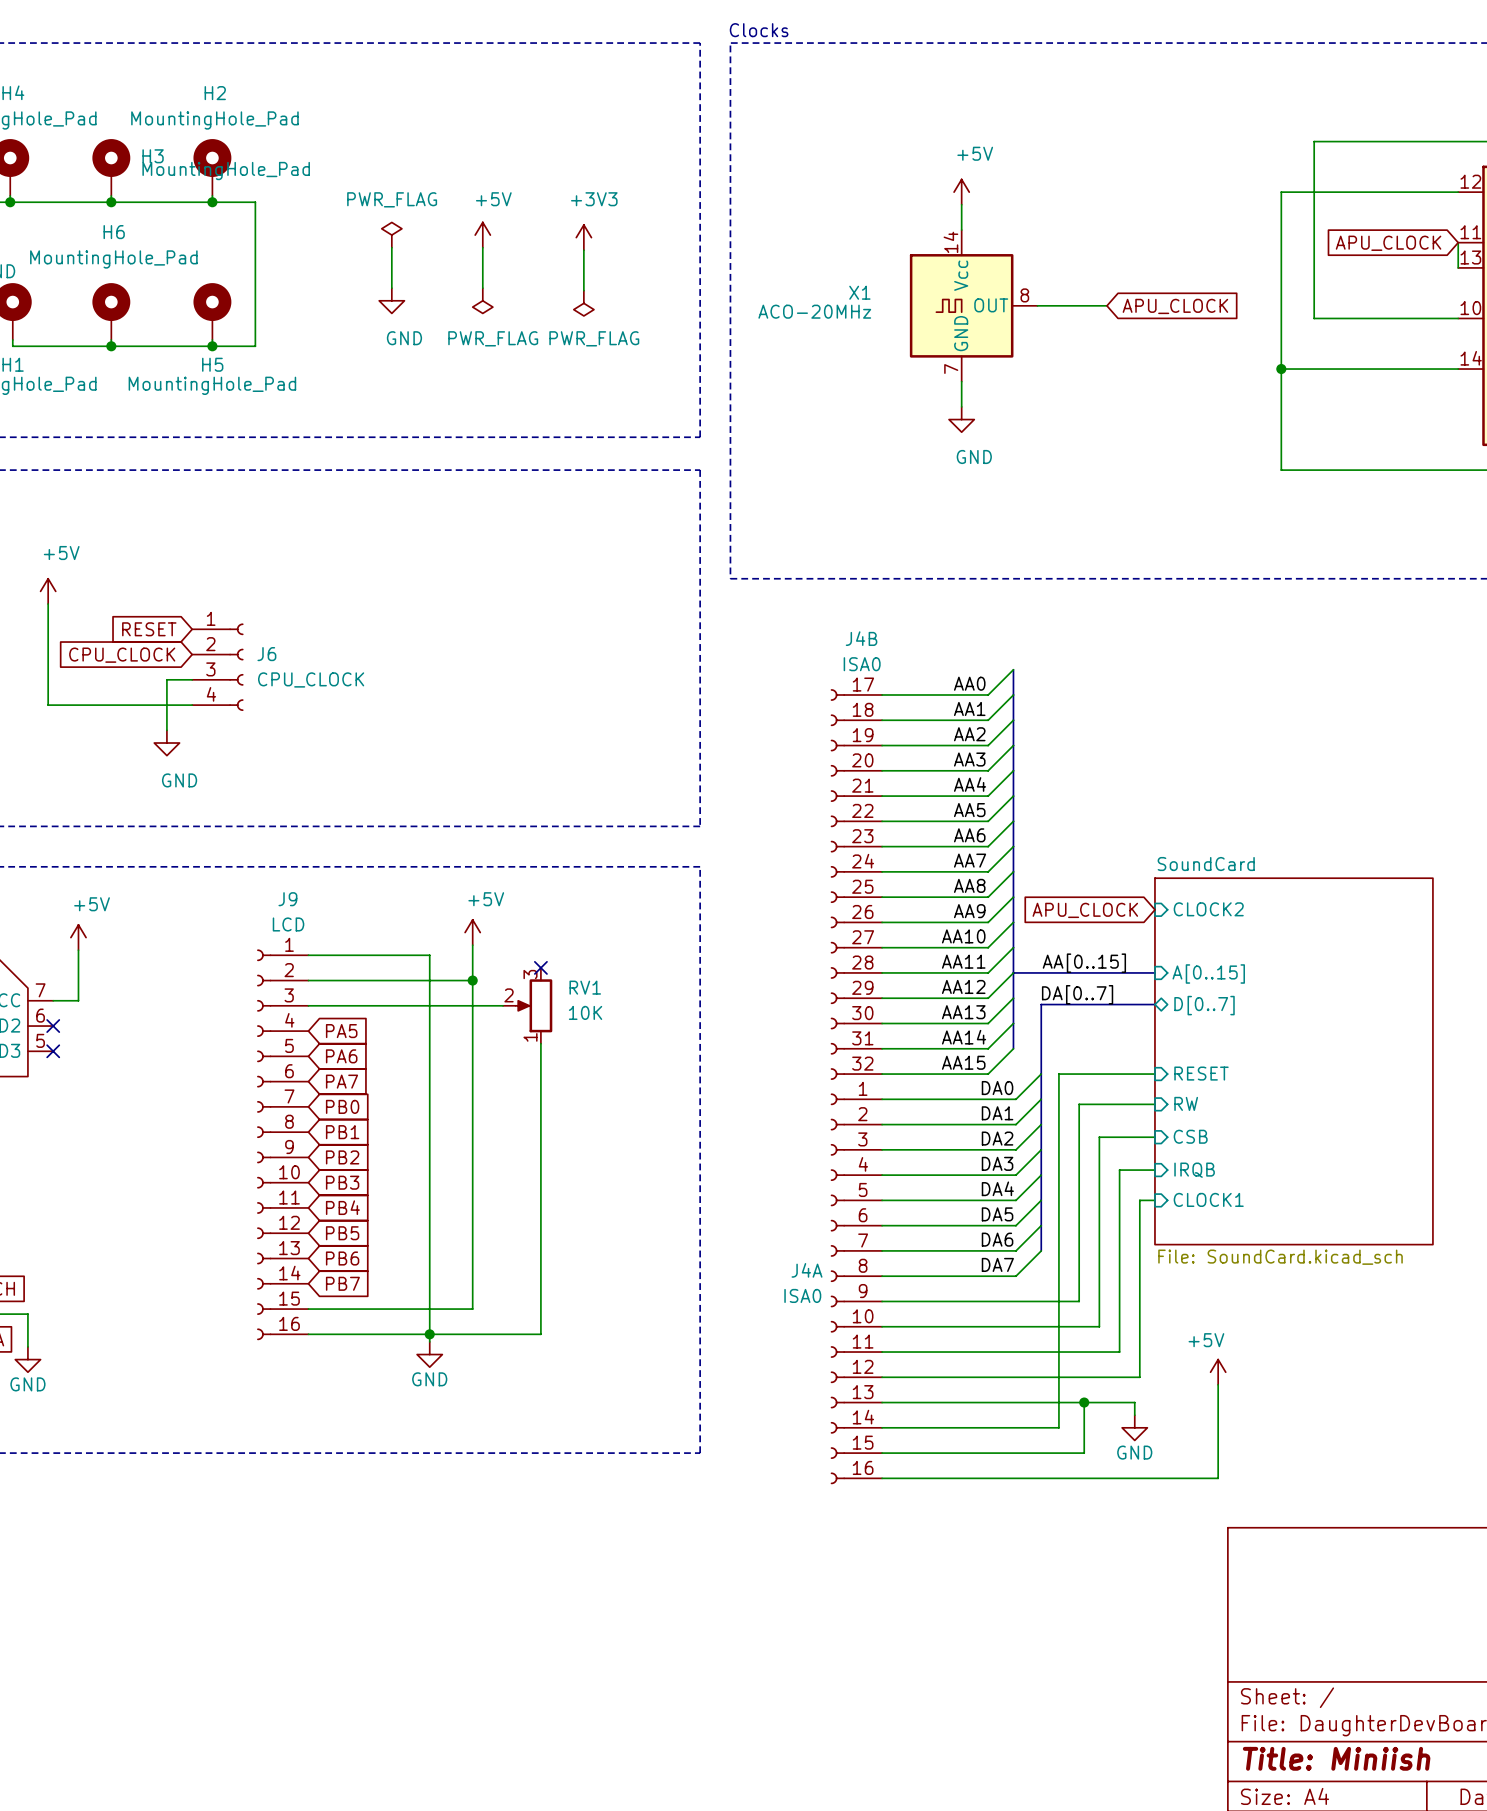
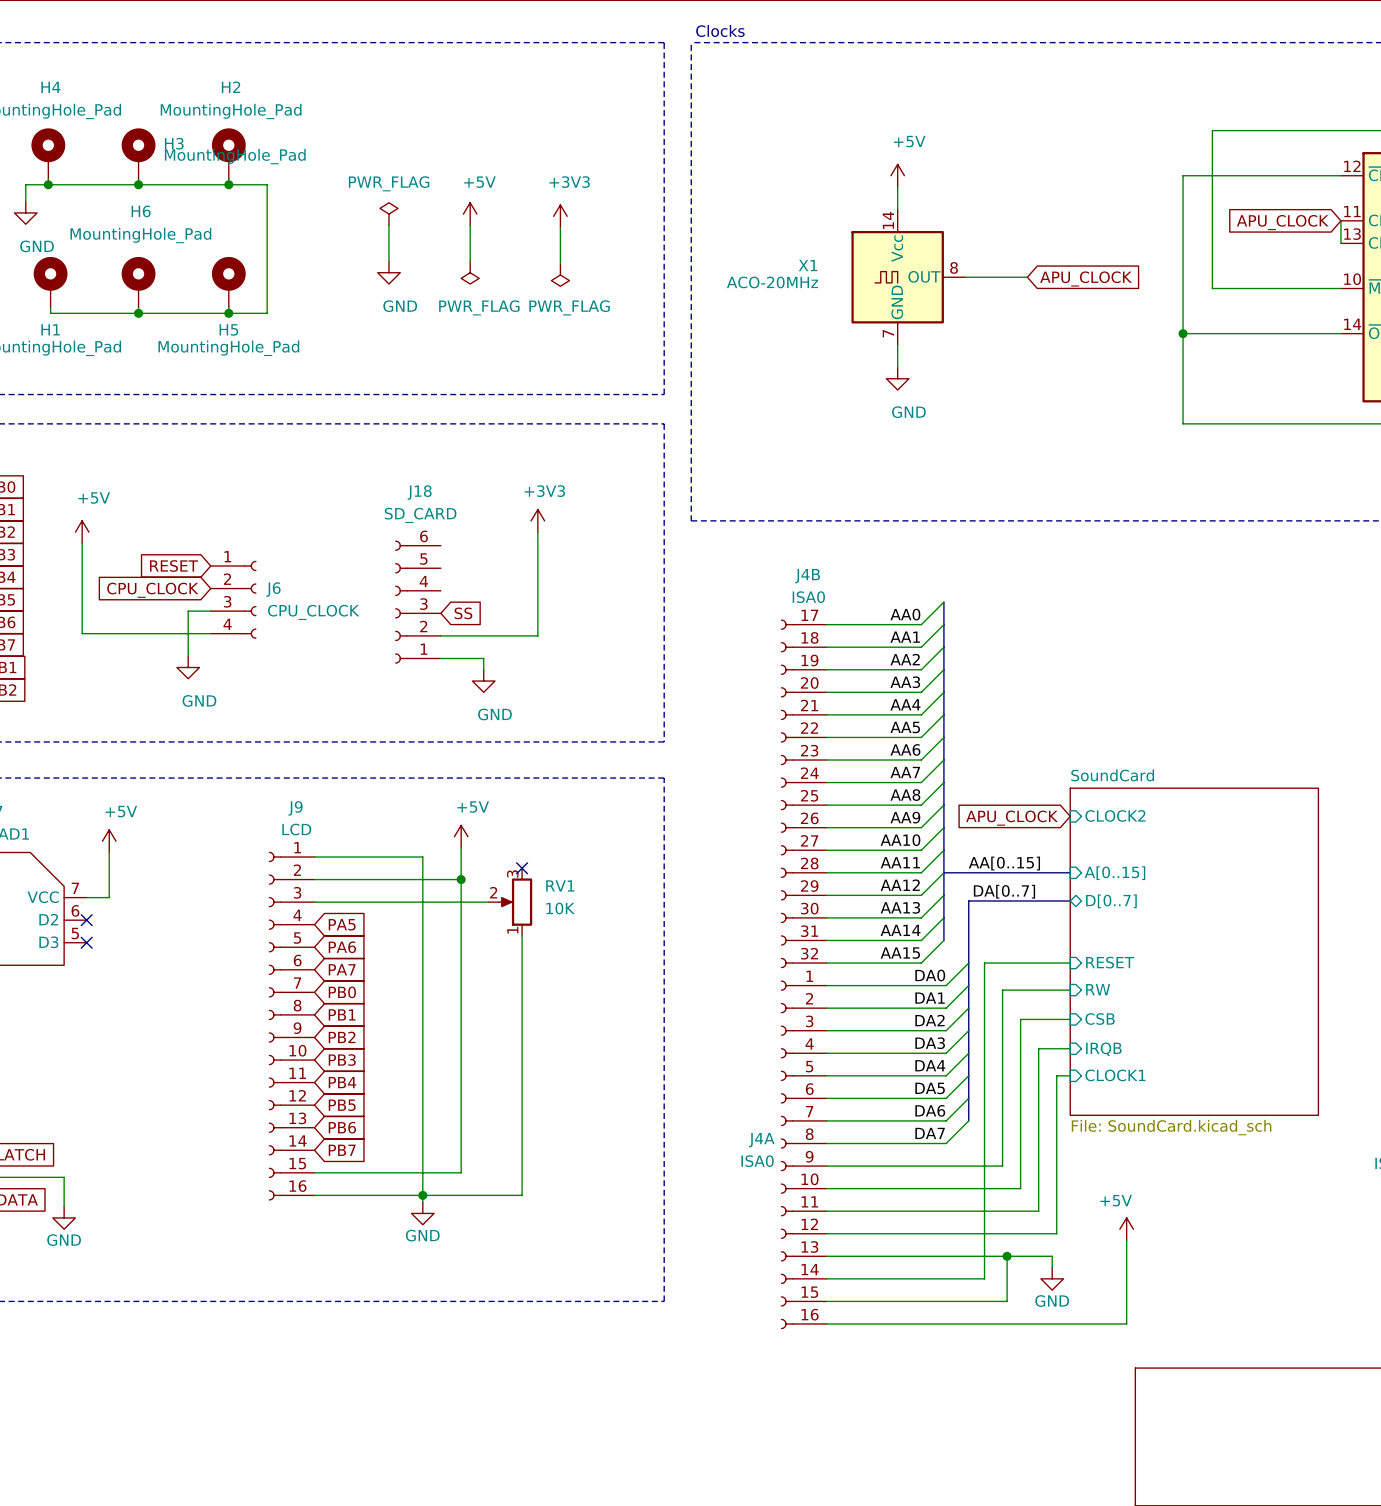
power symbol: none -> +3V3 (537, 520)
wire: none -> (537, 532) (537, 635) (440, 635)
J18: none -> SD_CARD (417, 602)
global label: none -> SS (463, 613)
wire: none -> (440, 658) (483, 658) (483, 669)
power symbol: none -> GND (483, 681)

